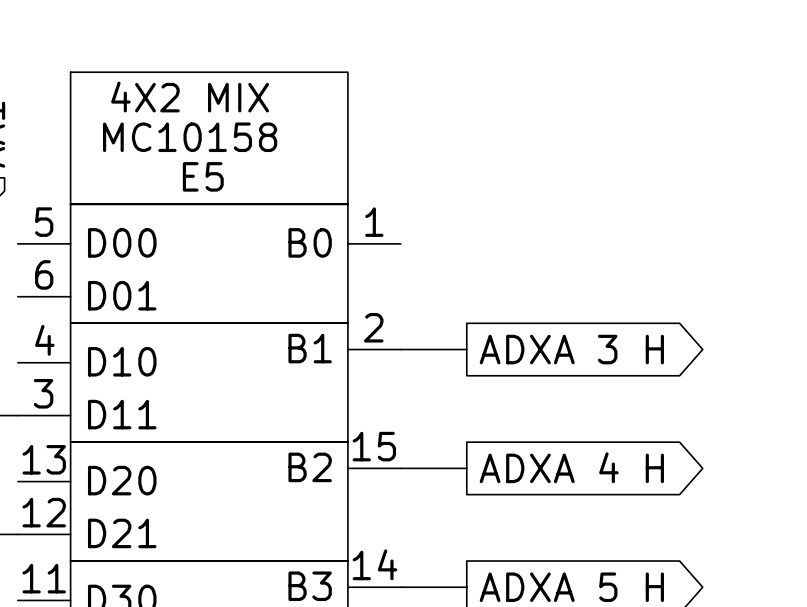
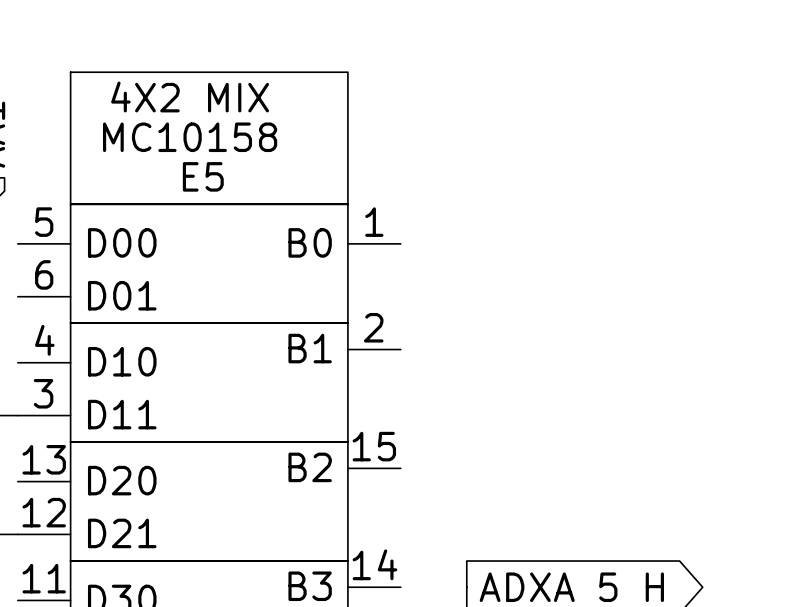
wire: (400, 349) (466, 349) -> none
global label: ADXA 3 H (571, 349) -> none
global label: ADXA 4 H (571, 467) -> none
wire: (400, 468) (466, 468) -> none
wire: (400, 587) (466, 587) -> none

